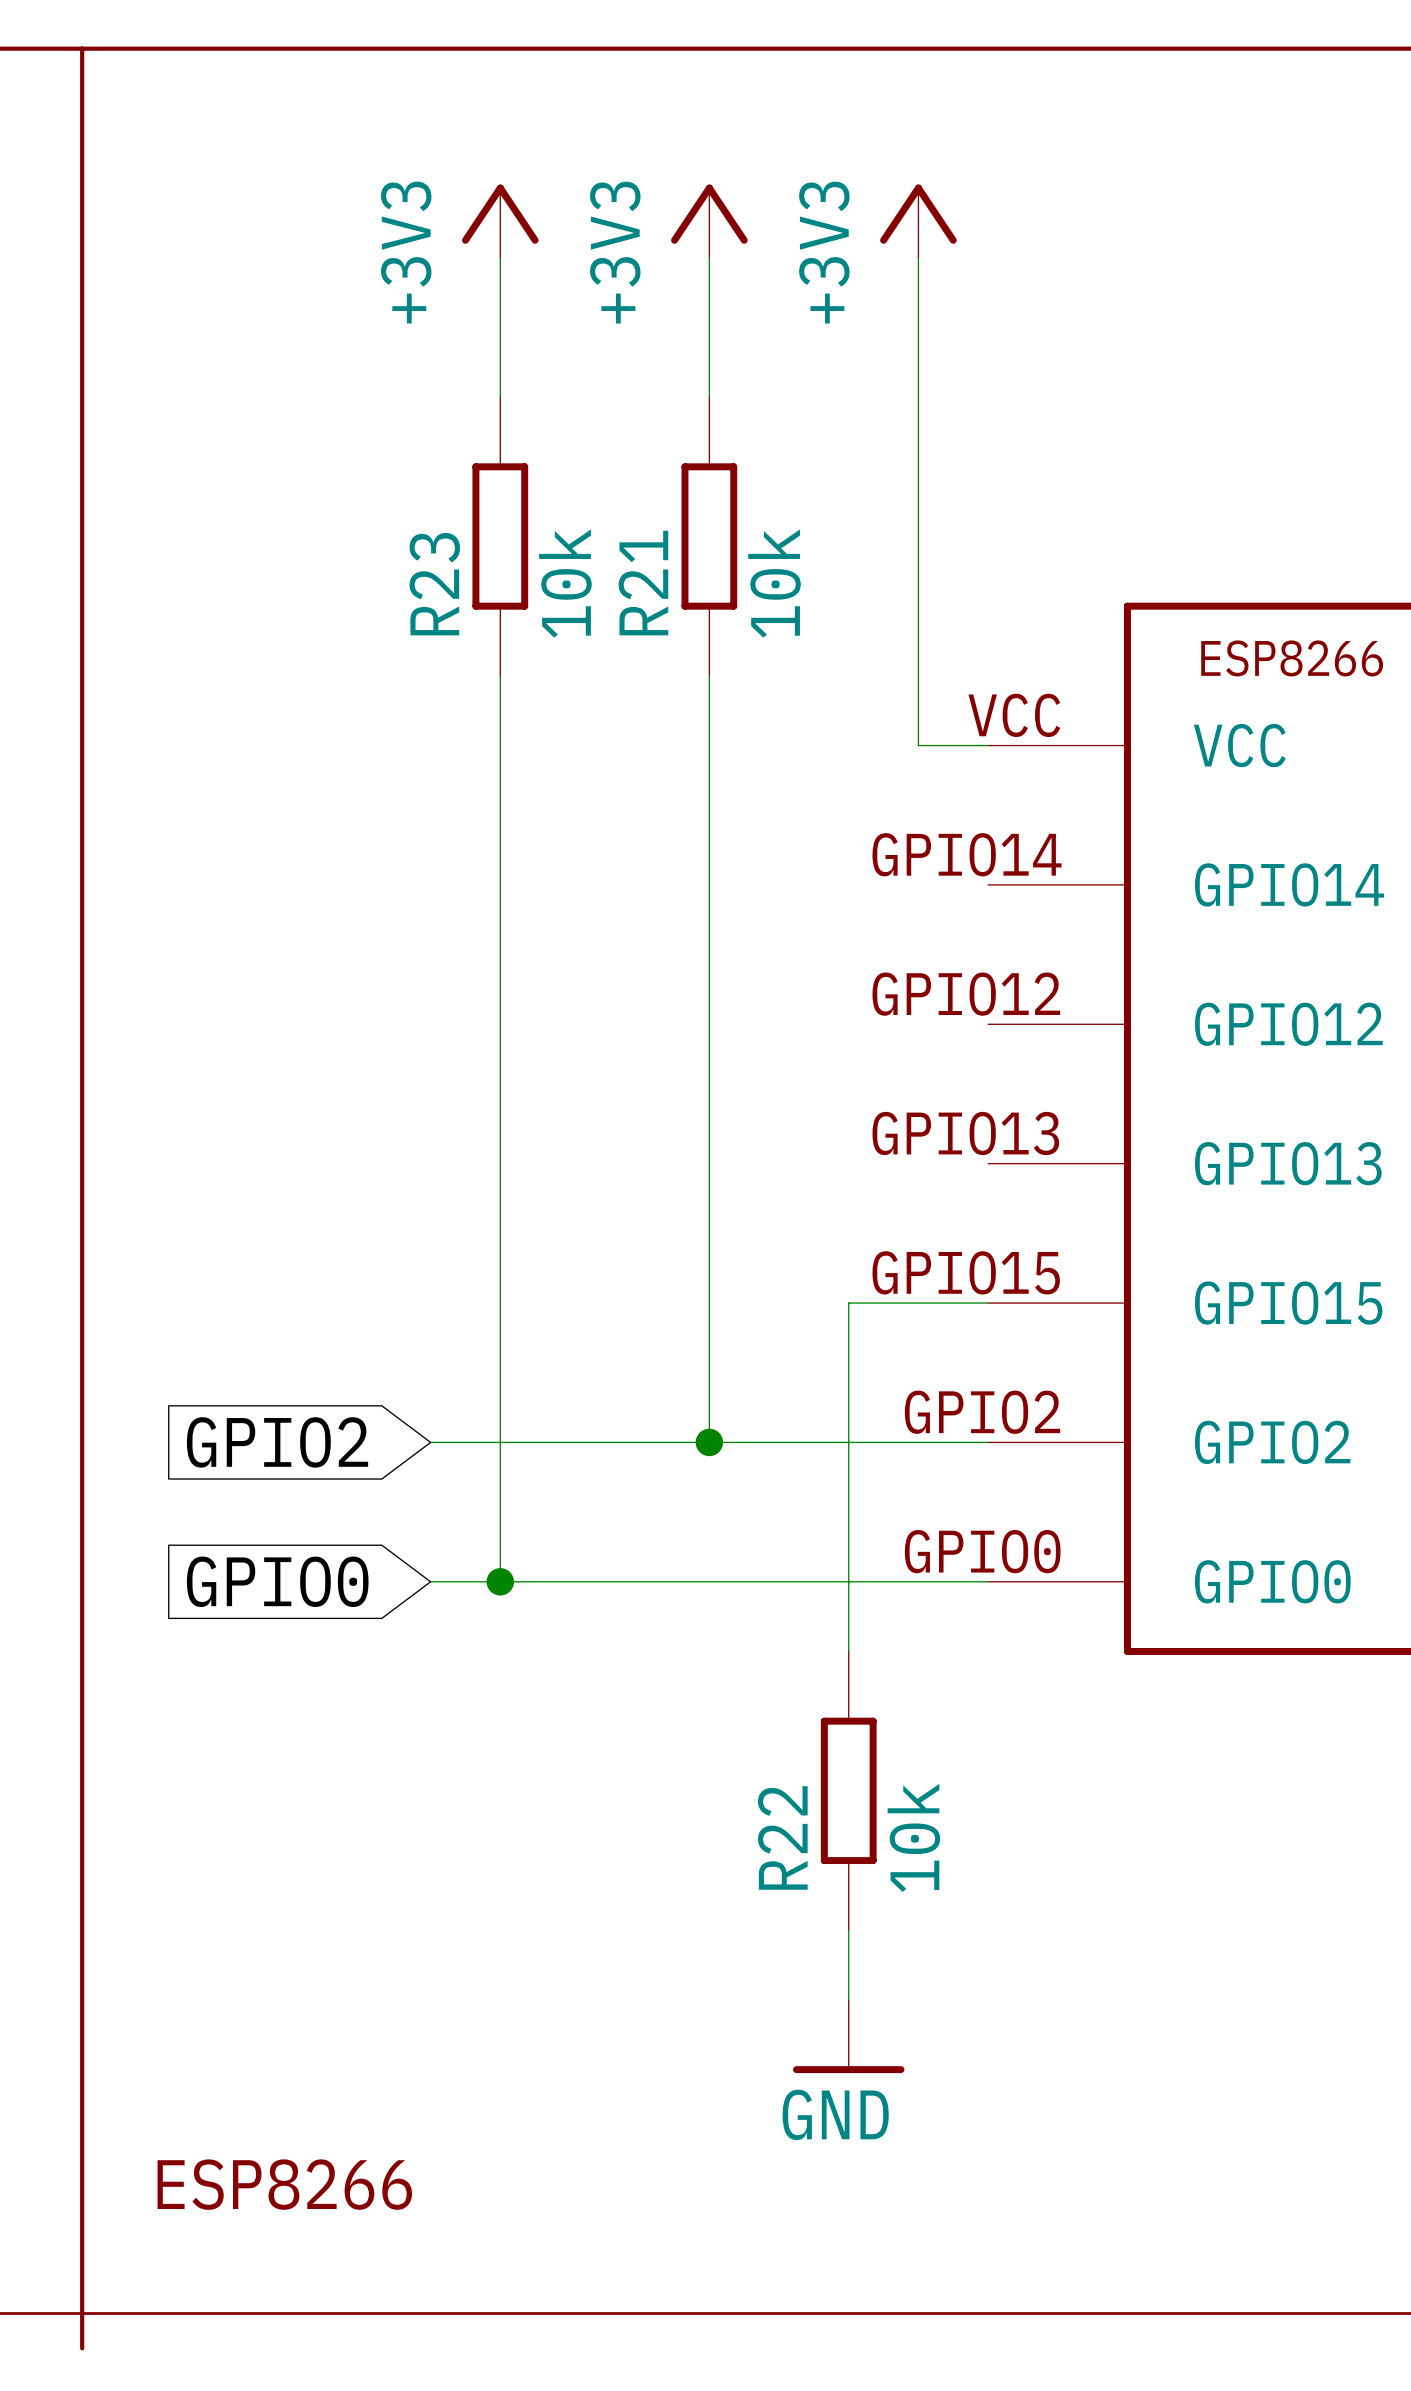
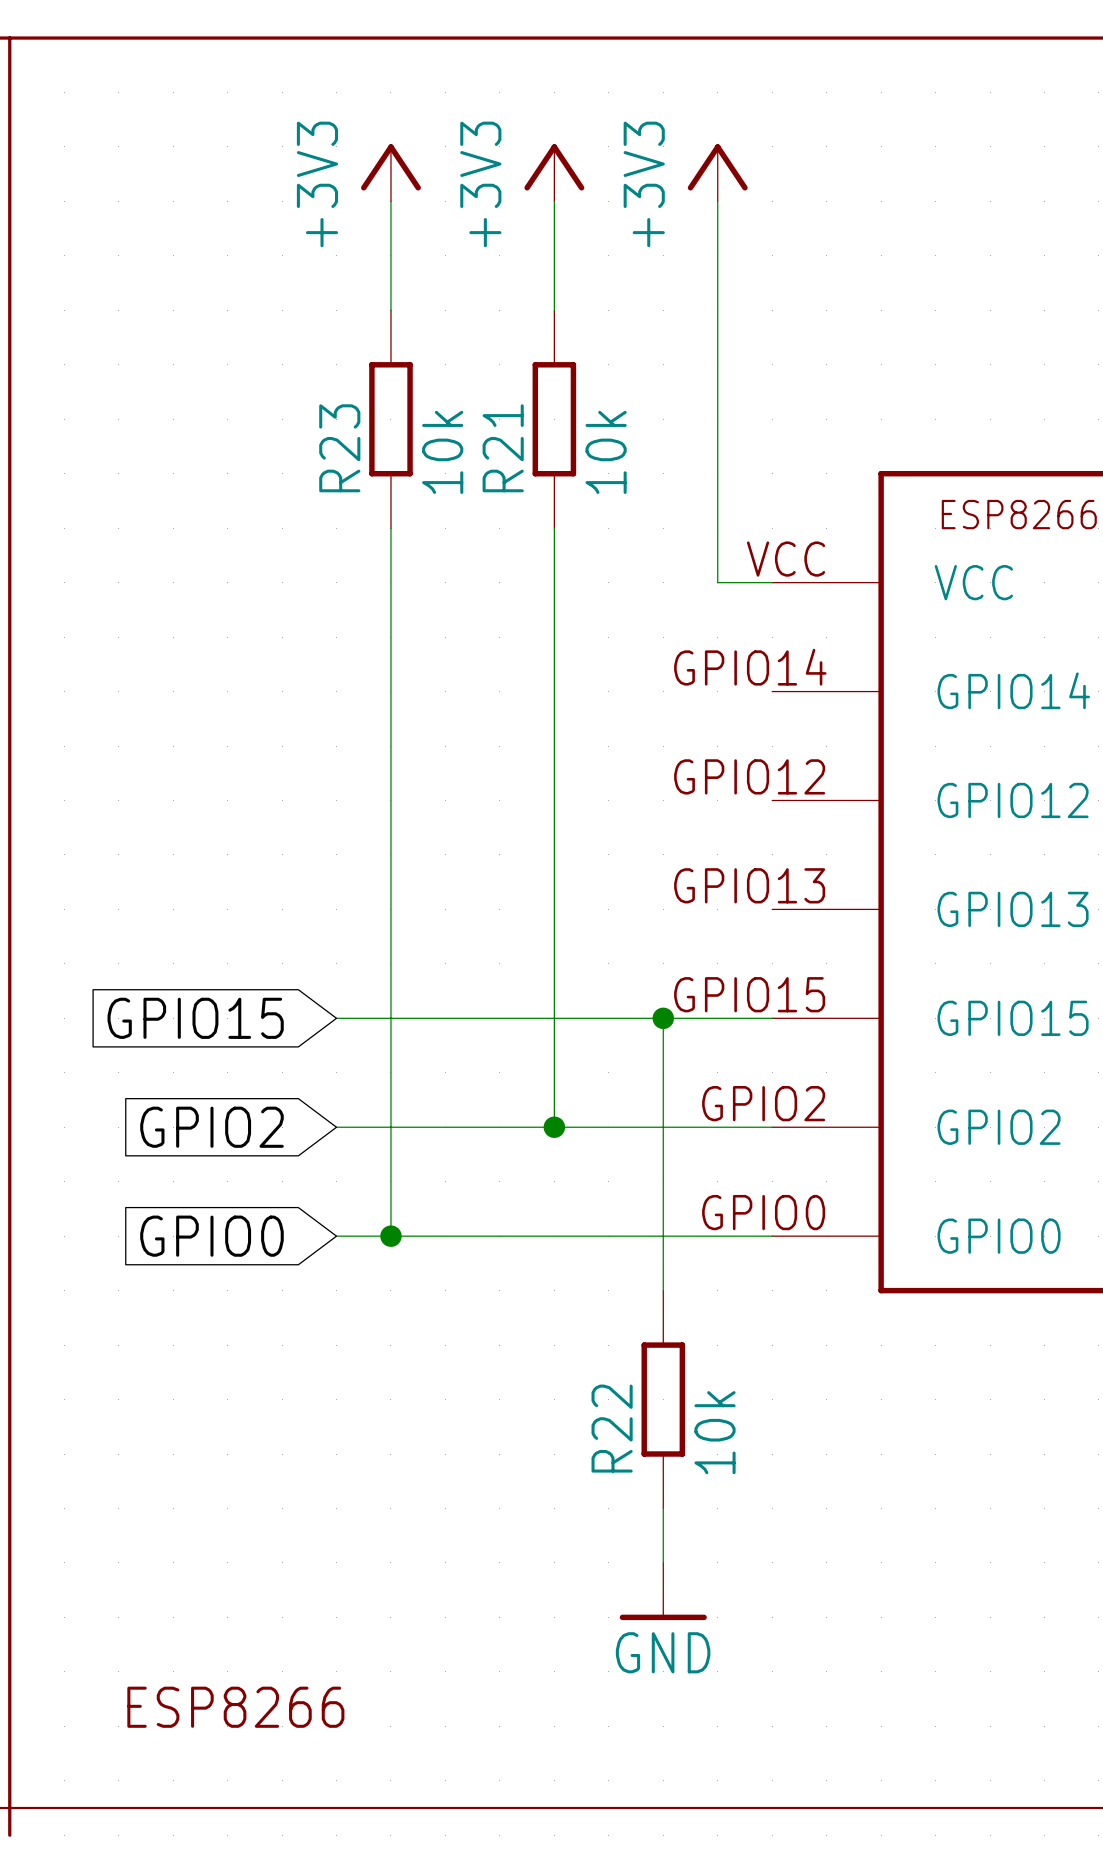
line: (82, 48) (82, 2348) -> (9, 38) (9, 1835)
global label: none -> GPIO15 (195, 1018)
wire: none -> (336, 1018) (663, 1018)
junction: none -> (663, 1018)

